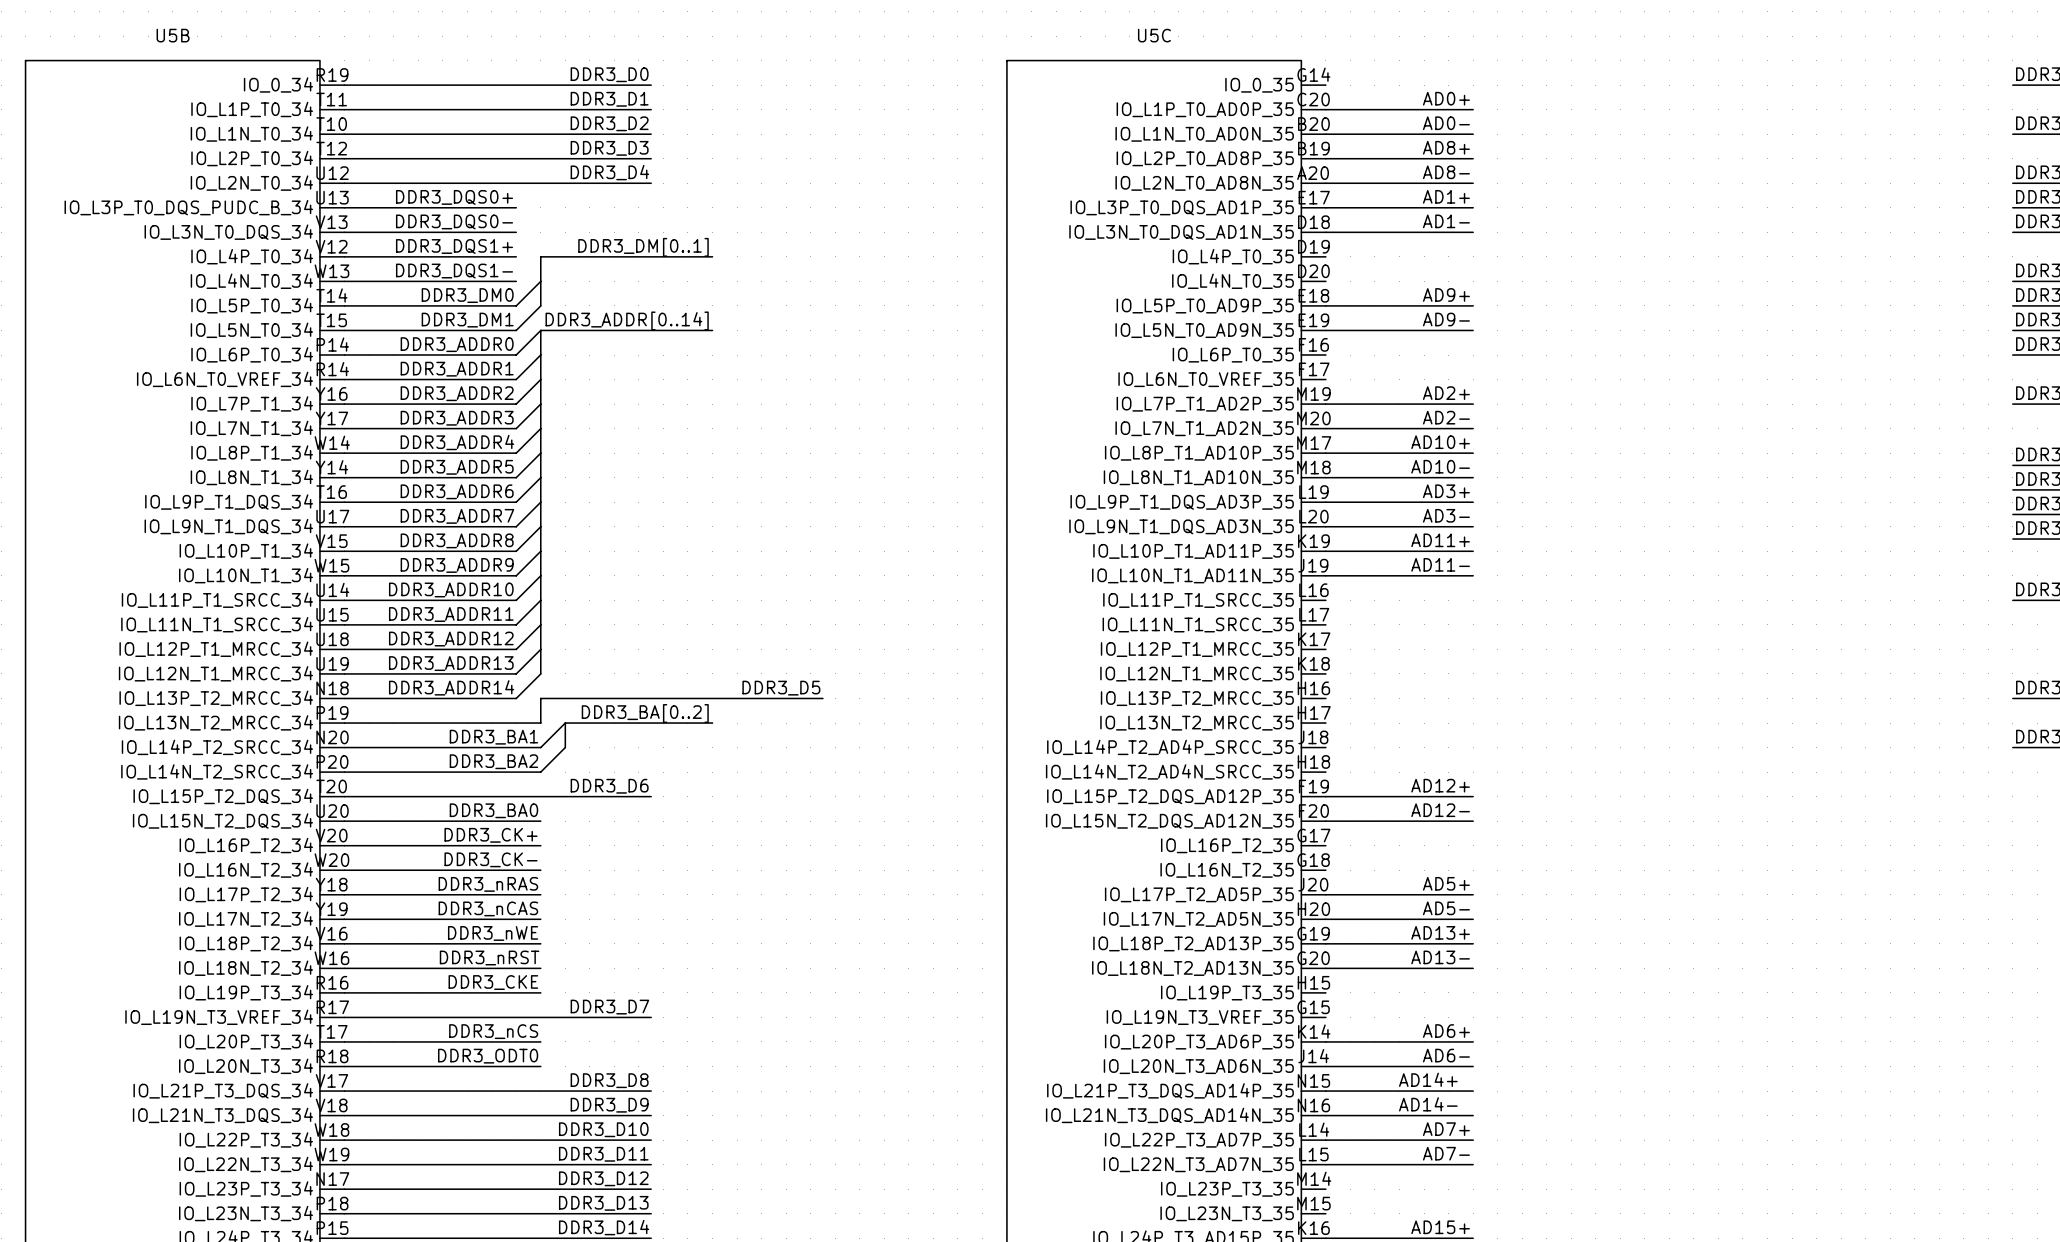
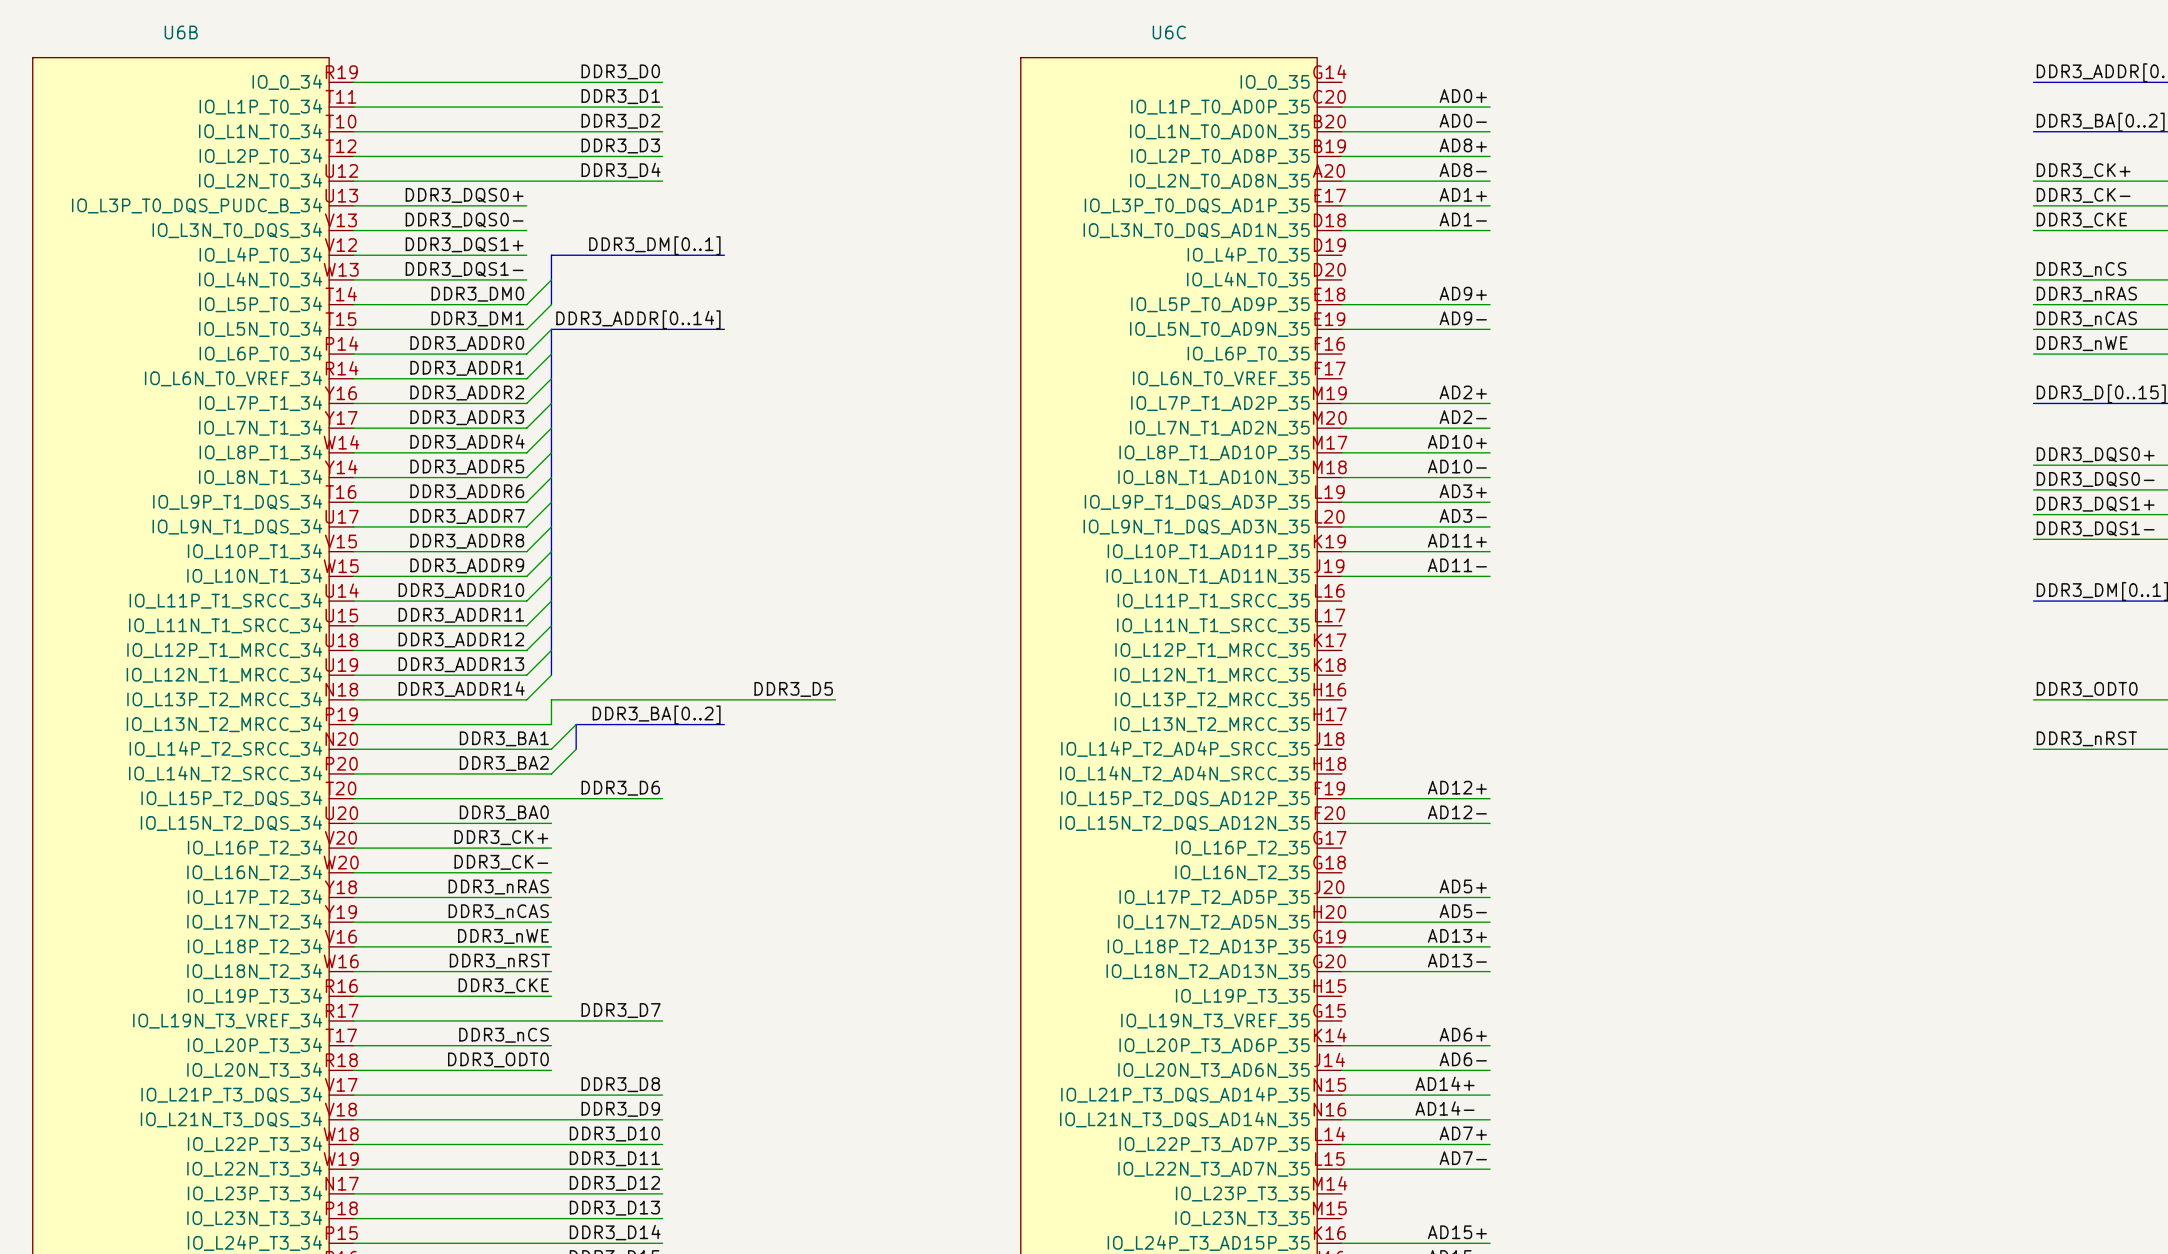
U5B name: U5B (173, 35) -> U6B (181, 32)
U5C name: U5C (1154, 35) -> U6C (1169, 32)

